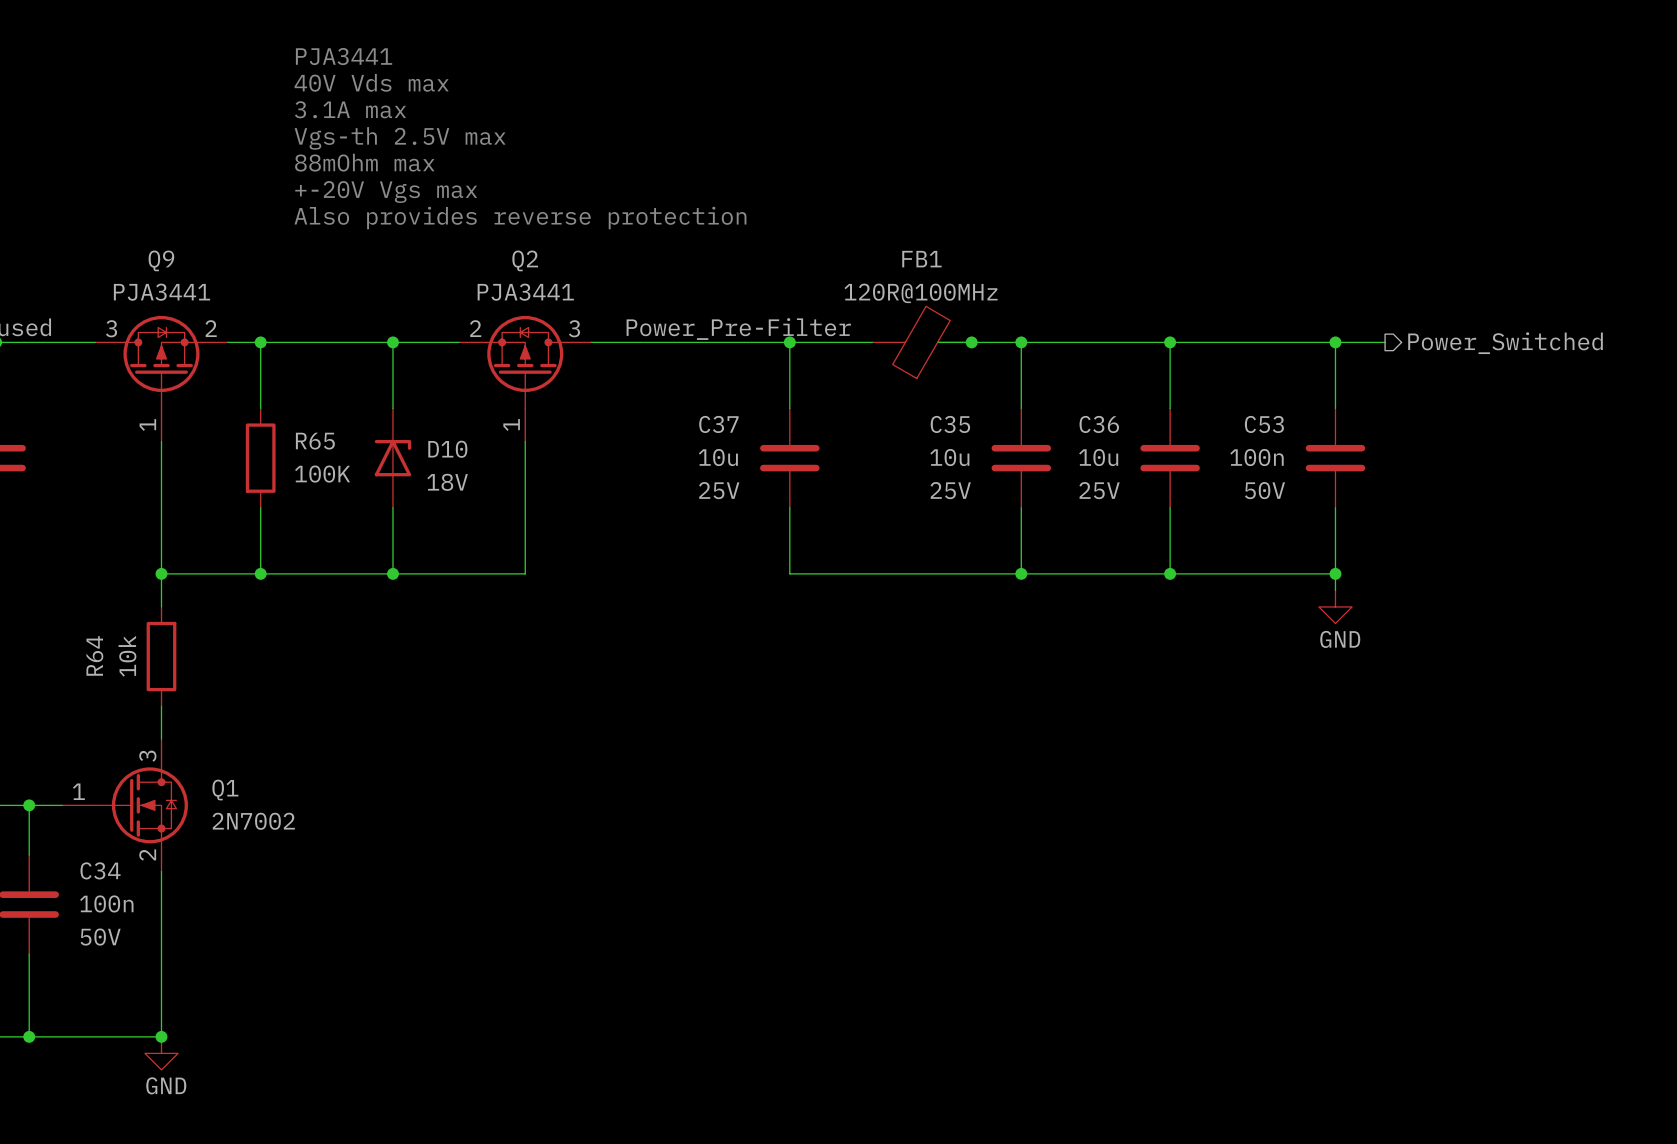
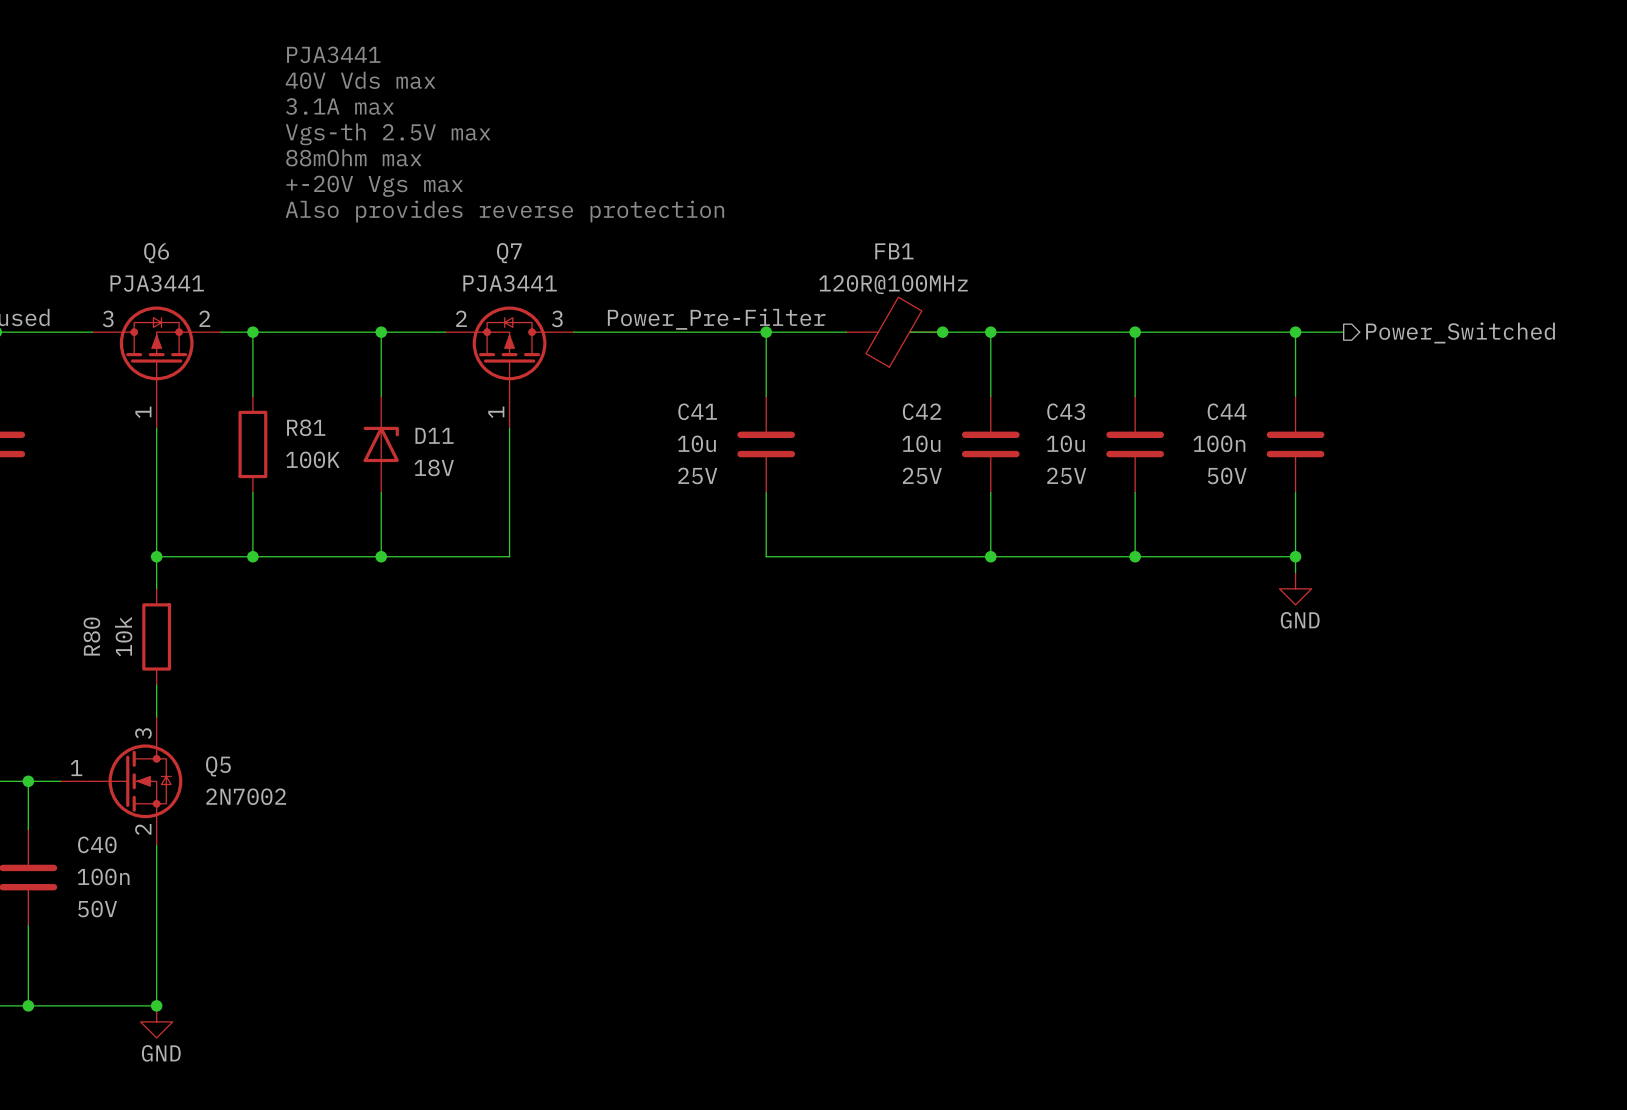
Q9 name: Q9 (161, 260) -> Q6 (156, 253)
Q2 name: Q2 (525, 260) -> Q7 (509, 253)
C37 name: C37 (718, 424) -> C41 (697, 411)
C35 name: C35 (950, 424) -> C42 (922, 411)
C36 name: C36 (1099, 424) -> C43 (1066, 411)
C53 name: C53 (1264, 424) -> C44 (1227, 411)
R65 name: R65 (315, 441) -> R81 (306, 427)
D10 name: D10 (447, 449) -> D11 (434, 435)
R64 name: R64 (94, 655) -> R80 (91, 636)
Q1 name: Q1 (225, 790) -> Q5 (218, 766)
C34 name: C34 (100, 870) -> C40 (97, 844)

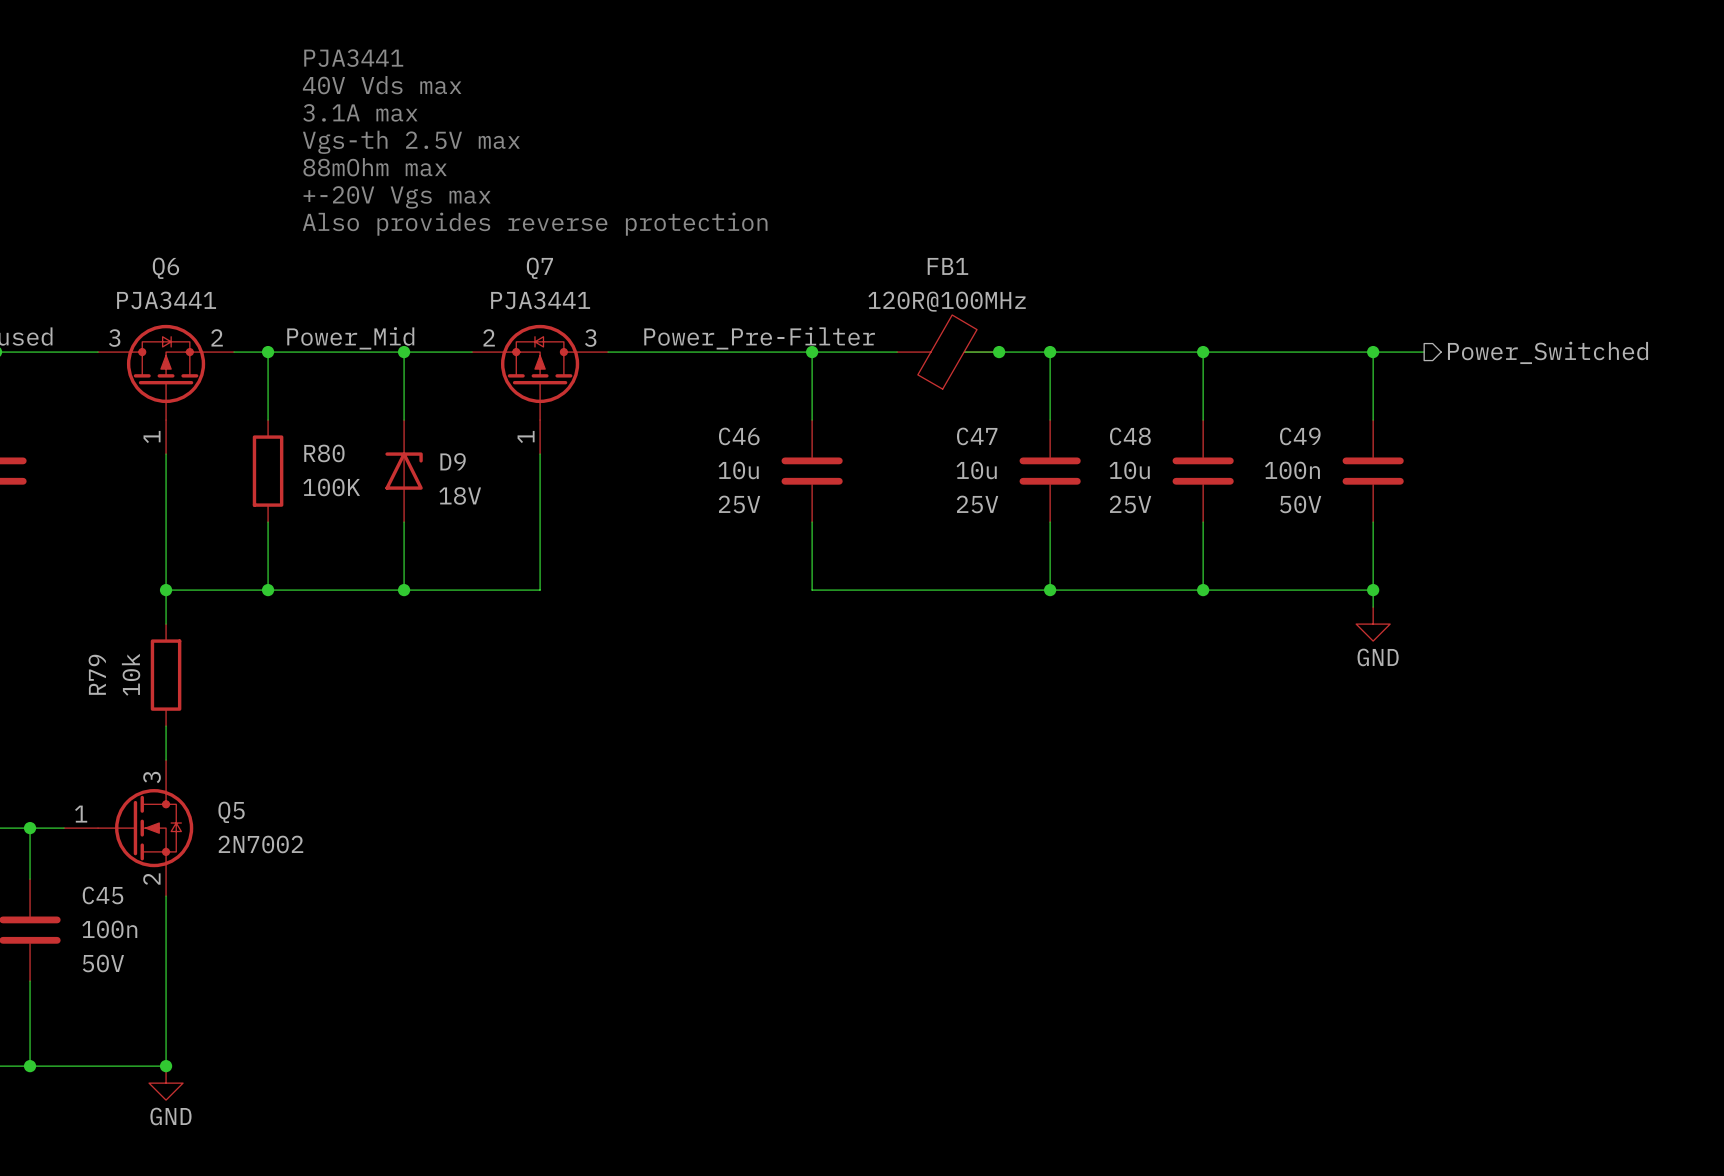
label: none -> Power_Mid (350, 338)
C41 name: C41 (697, 411) -> C46 (739, 436)
C42 name: C42 (922, 411) -> C47 (977, 436)
C43 name: C43 (1066, 411) -> C48 (1130, 436)
C44 name: C44 (1227, 411) -> C49 (1300, 436)
R81 name: R81 (306, 427) -> R80 (324, 453)
D11 name: D11 (434, 435) -> D9 (453, 461)
R80 name: R80 (91, 636) -> R79 (97, 674)
C40 name: C40 (97, 844) -> C45 (103, 895)

